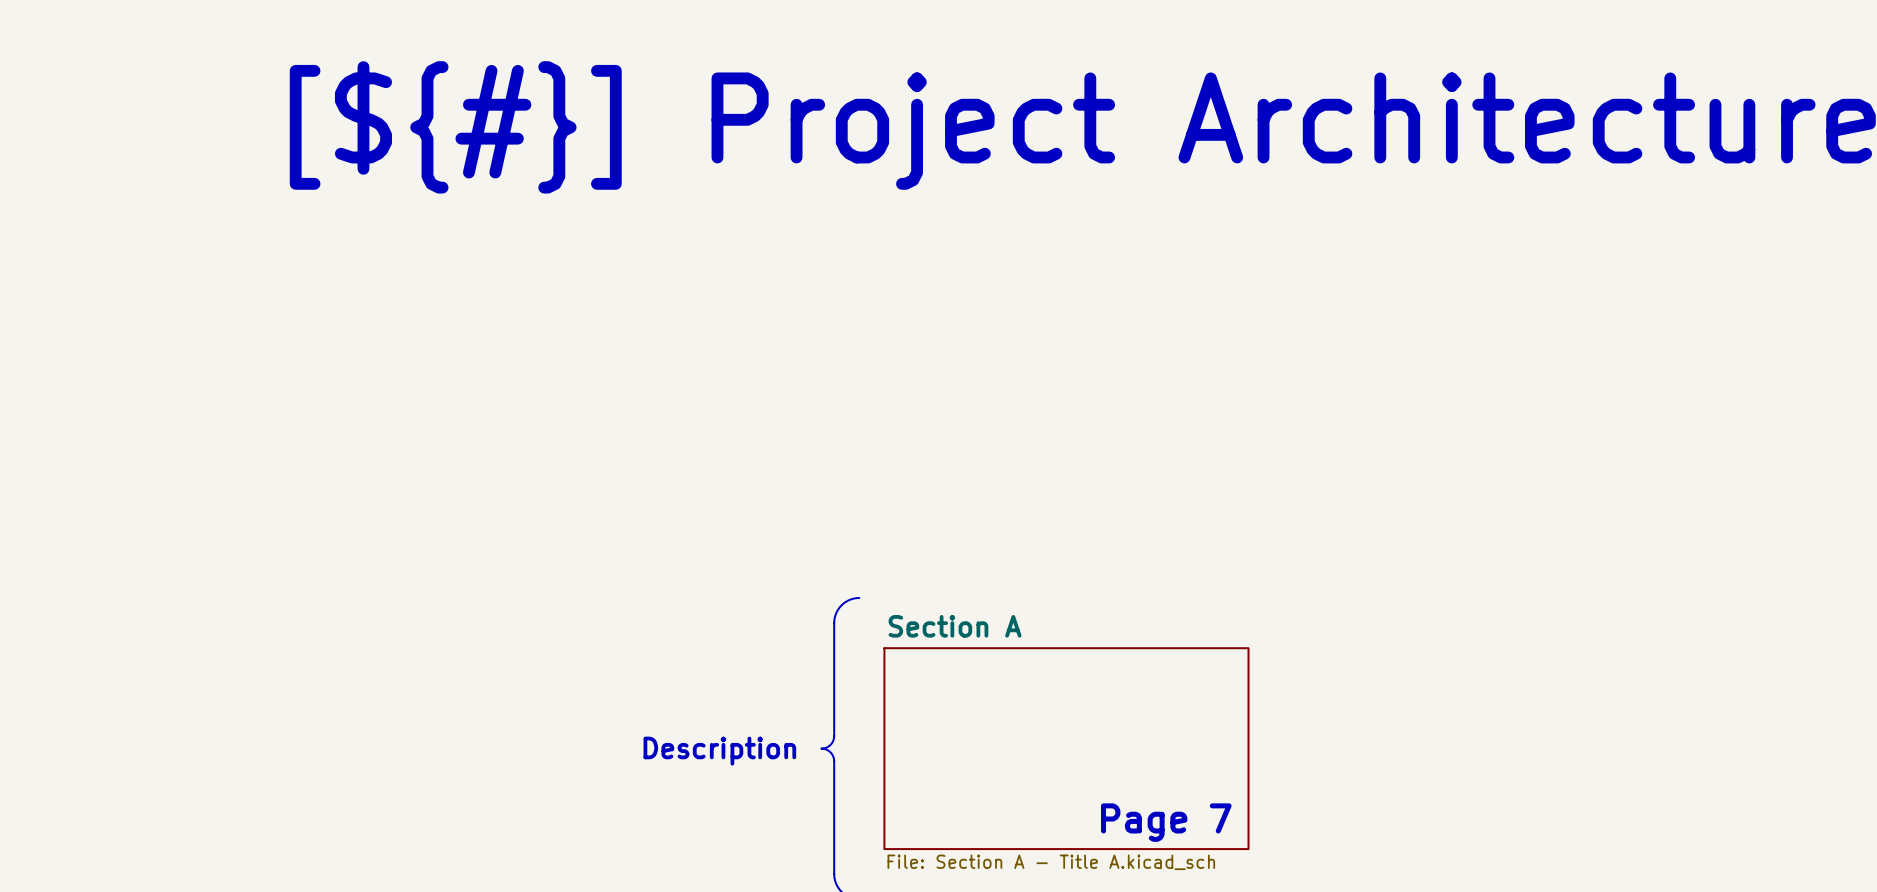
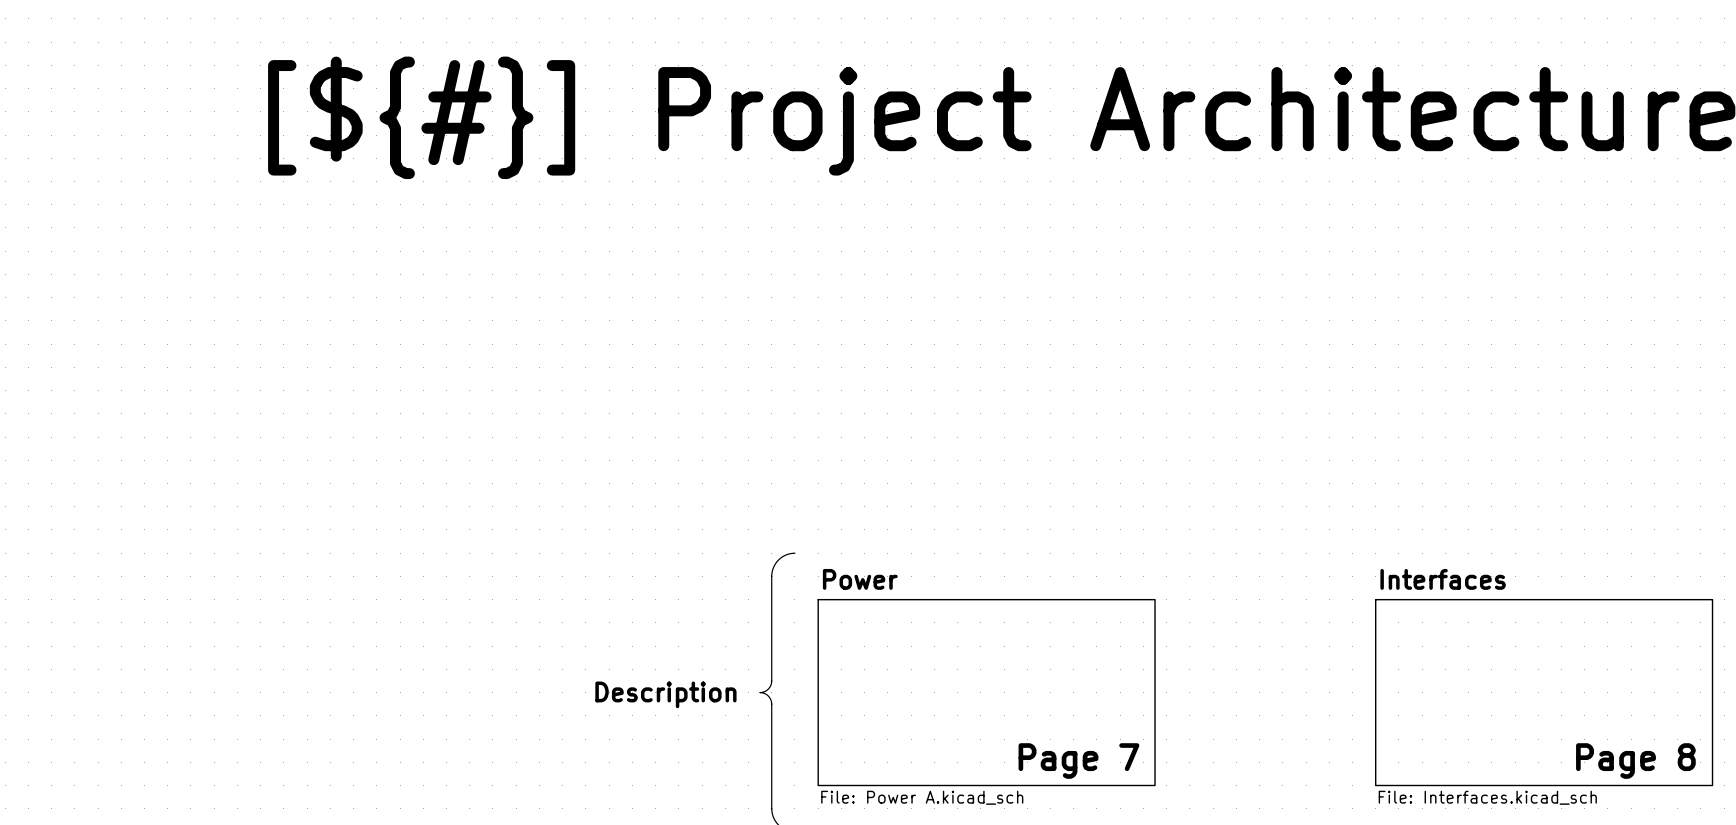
sheet Section A name: Section A (955, 626) -> Power (860, 579)
sheet Interfaces: none -> File: Interfaces.kicad_sch (1544, 692)
text: none -> Page 8 (1635, 761)
sheet Section A value: File: Section A - Title A.kicad_sch (1051, 862) -> File: Power A.kicad_sch (922, 797)

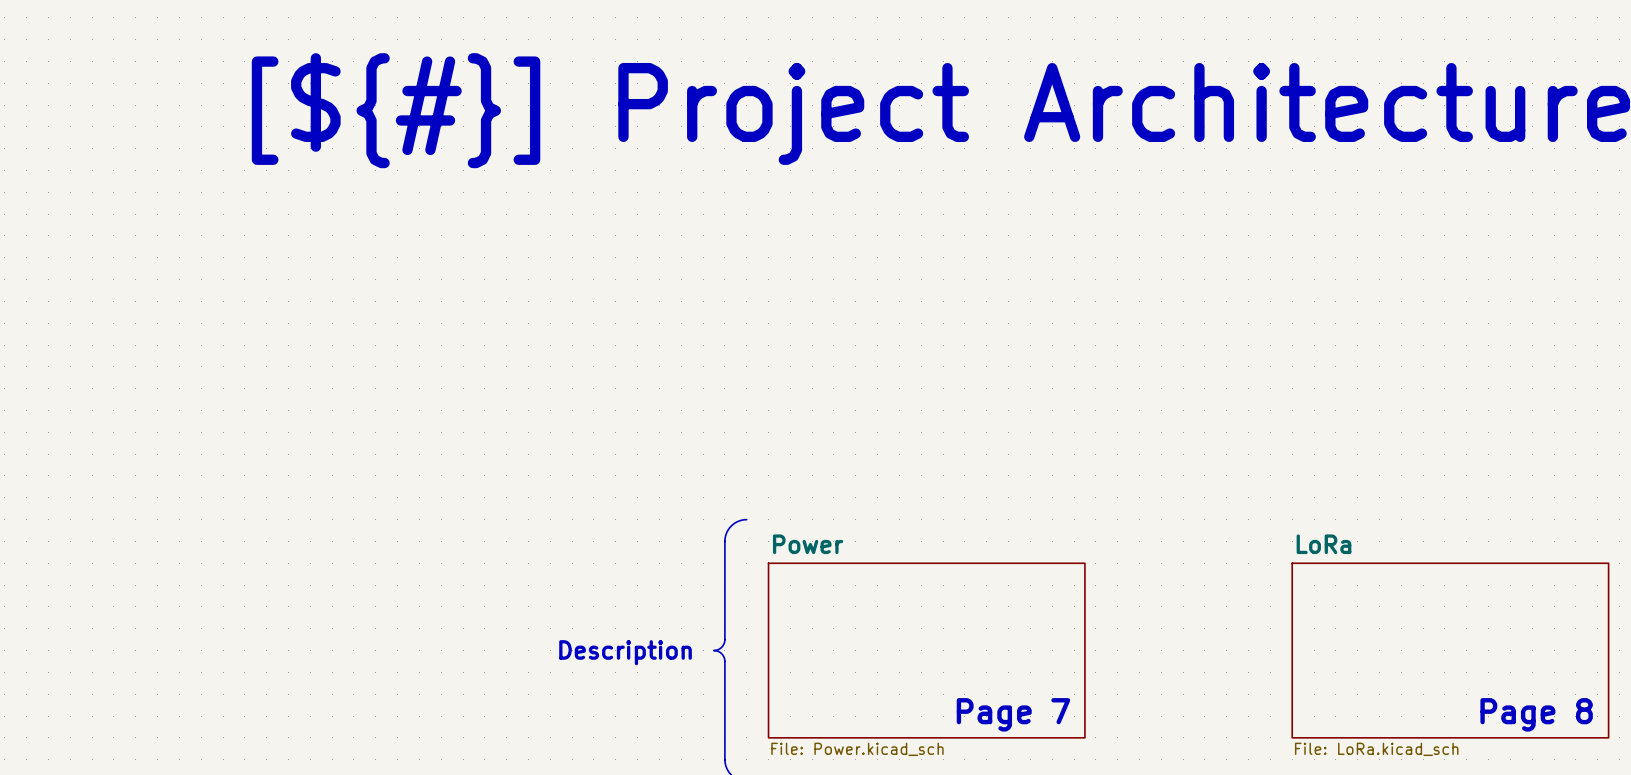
sheet Interfaces name: Interfaces (1443, 579) -> LoRa (1323, 544)
sheet Power value: File: Power A.kicad_sch (922, 797) -> File: Power.kicad_sch (857, 749)
sheet Interfaces value: File: Interfaces.kicad_sch (1487, 797) -> File: LoRa.kicad_sch (1376, 749)

